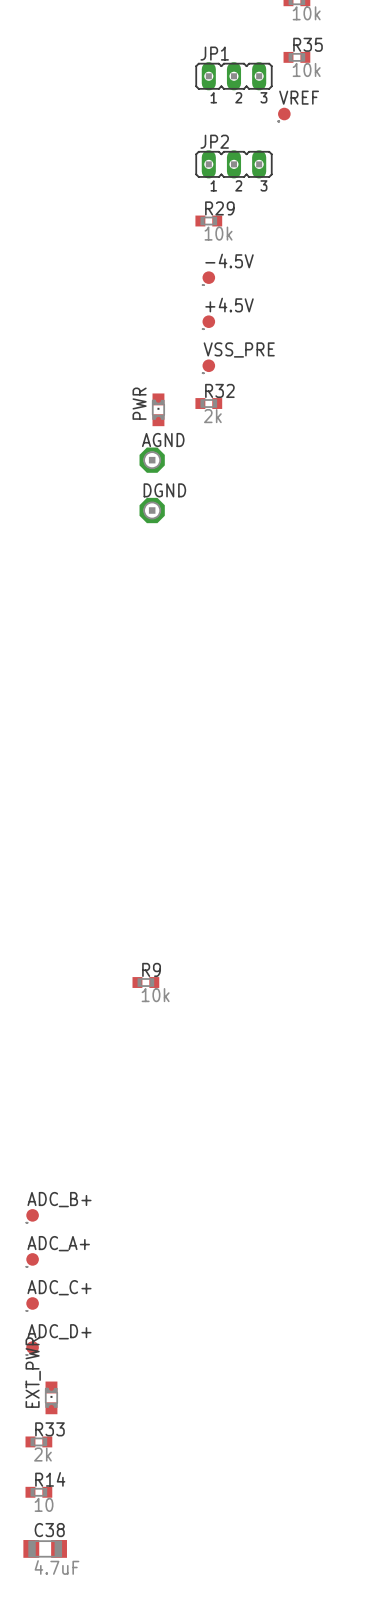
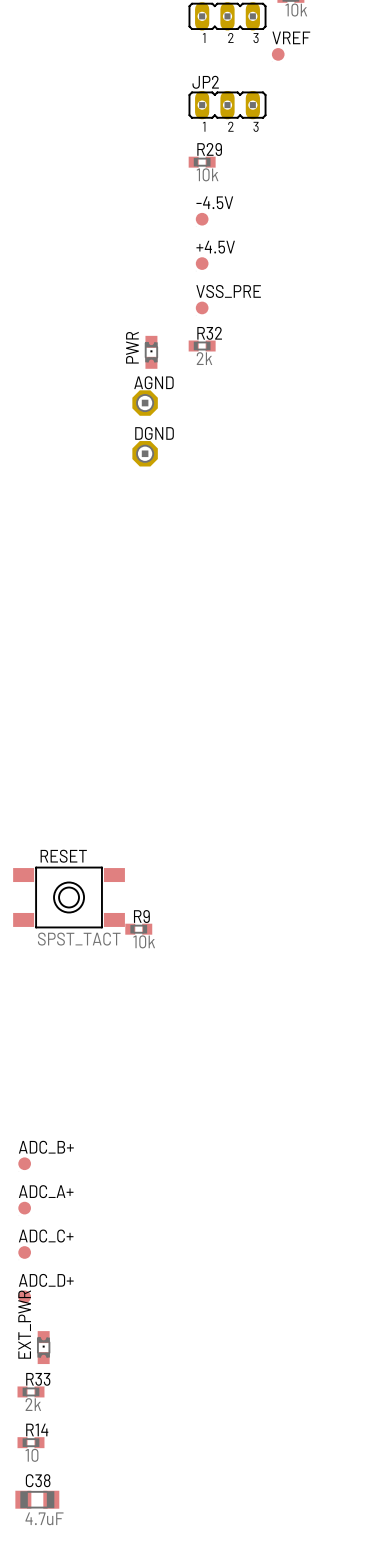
RESET: none -> SPST_TACT (69, 897)

